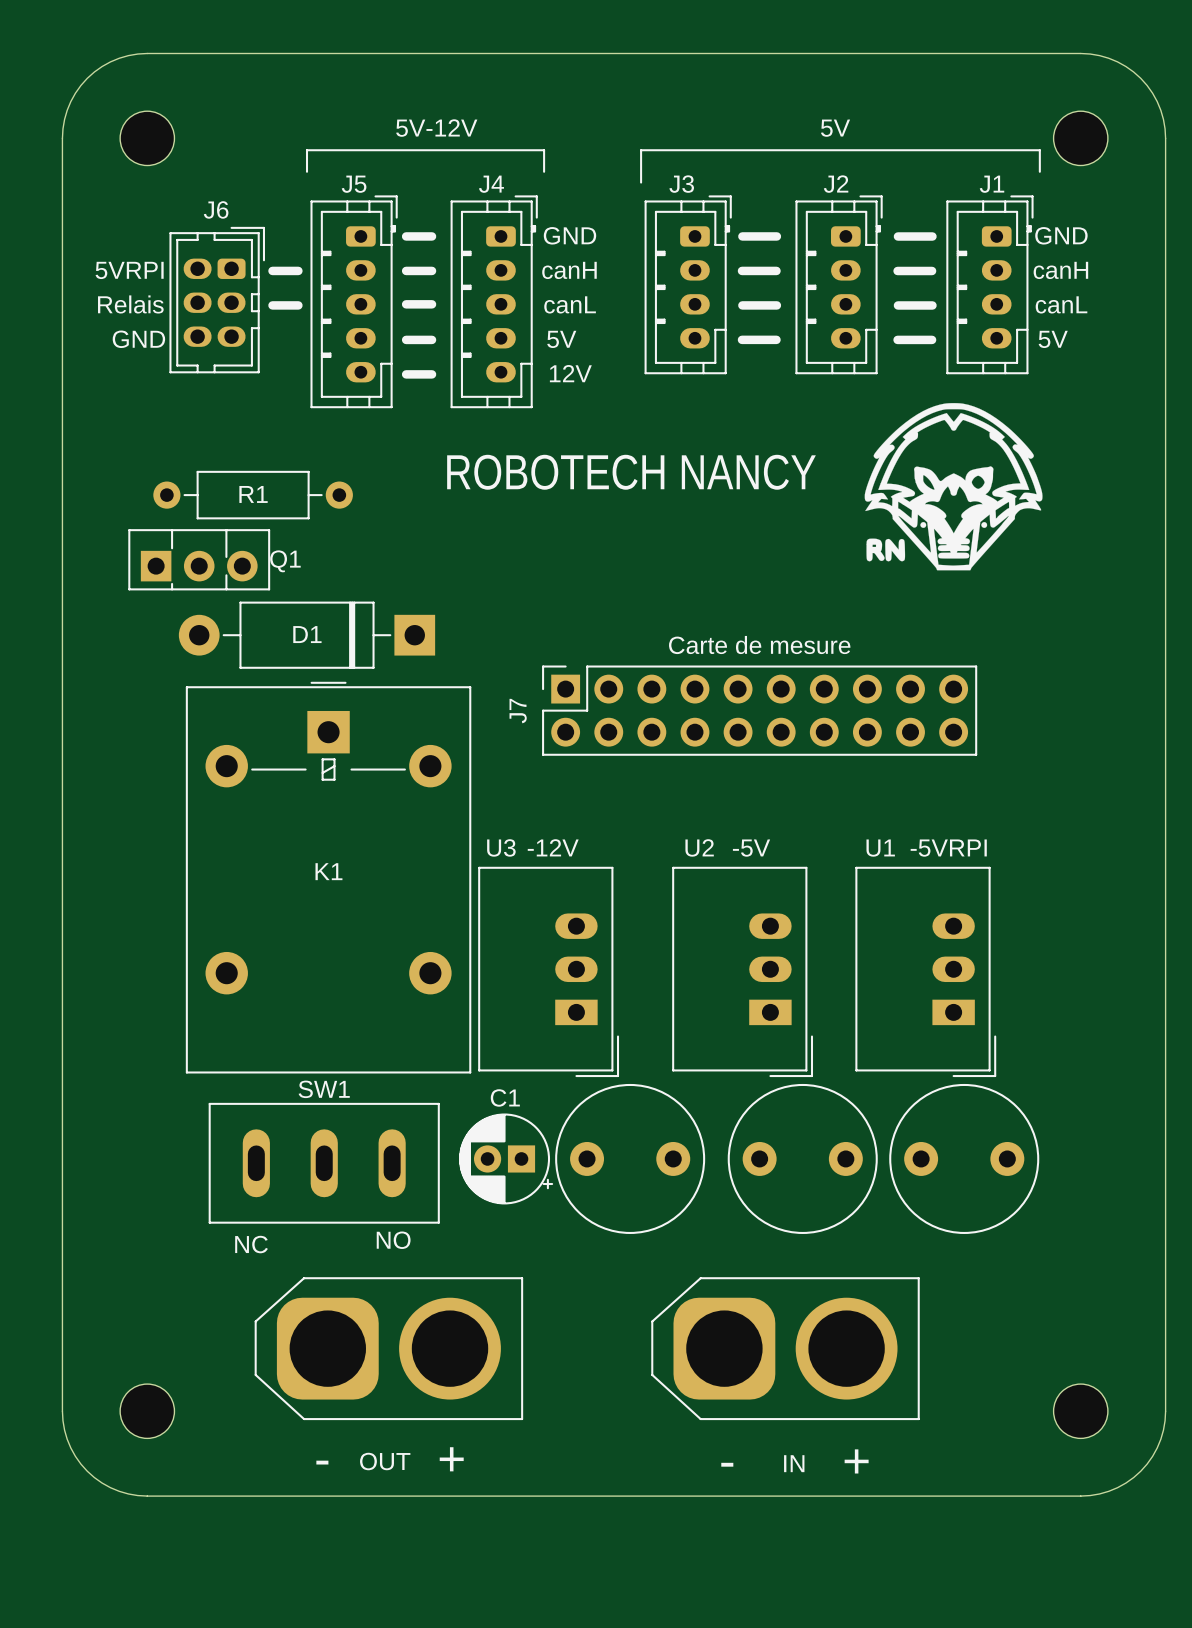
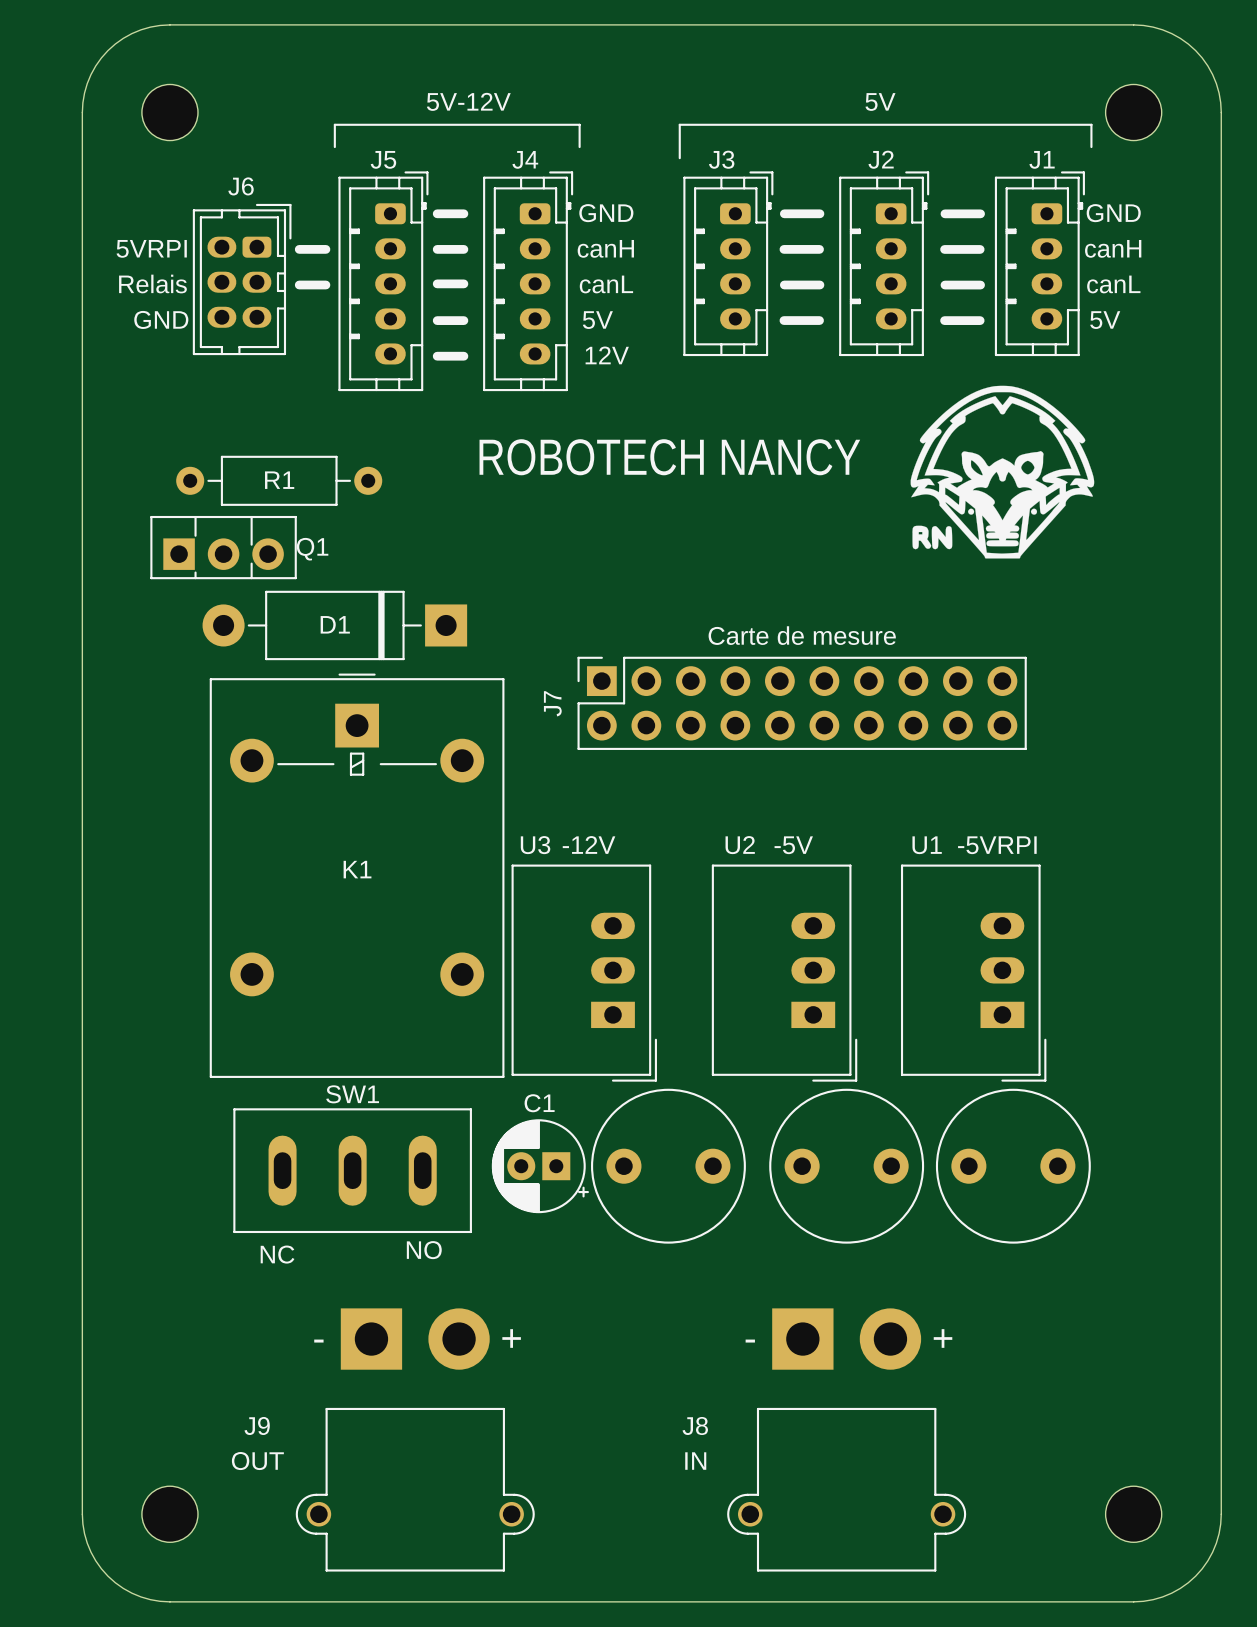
part: (388, 1348) -> none
part: (785, 1348) -> none
board edge: (62, 1411) (67, 1439) (75, 1456) (87, 1471) (110, 1487) (128, 1493) (147, 1496) (1090, 1495) (1117, 1487) (1133, 1477) (1147, 1464) (1160, 1439) (1165, 1411) -> (82, 1426) (82, 1524) (91, 1552) (108, 1576) (123, 1588) (150, 1599) (169, 1601) (1143, 1601) (1171, 1593) (1188, 1582) (1202, 1568) (1212, 1552) (1220, 1524) (1221, 1426)
part position: (147, 1411) -> (169, 1514)
part position: (1080, 1411) -> (1133, 1514)
J9: none -> (415, 1439)
J8: none -> (846, 1439)
text: + (451, 1459) -> none
text position: OUT (385, 1461) -> OUT (257, 1461)
text: + (856, 1461) -> none
text: - (322, 1462) -> none
text position: IN (794, 1463) -> IN (695, 1461)
text: - (727, 1464) -> none

